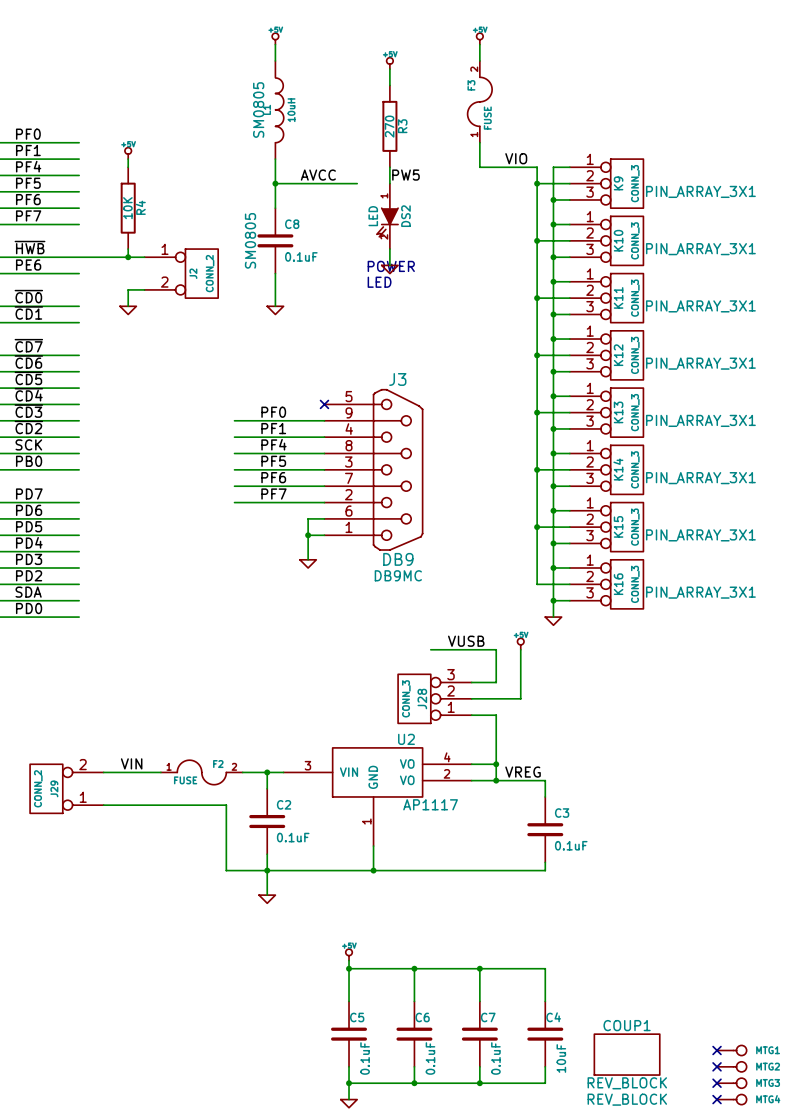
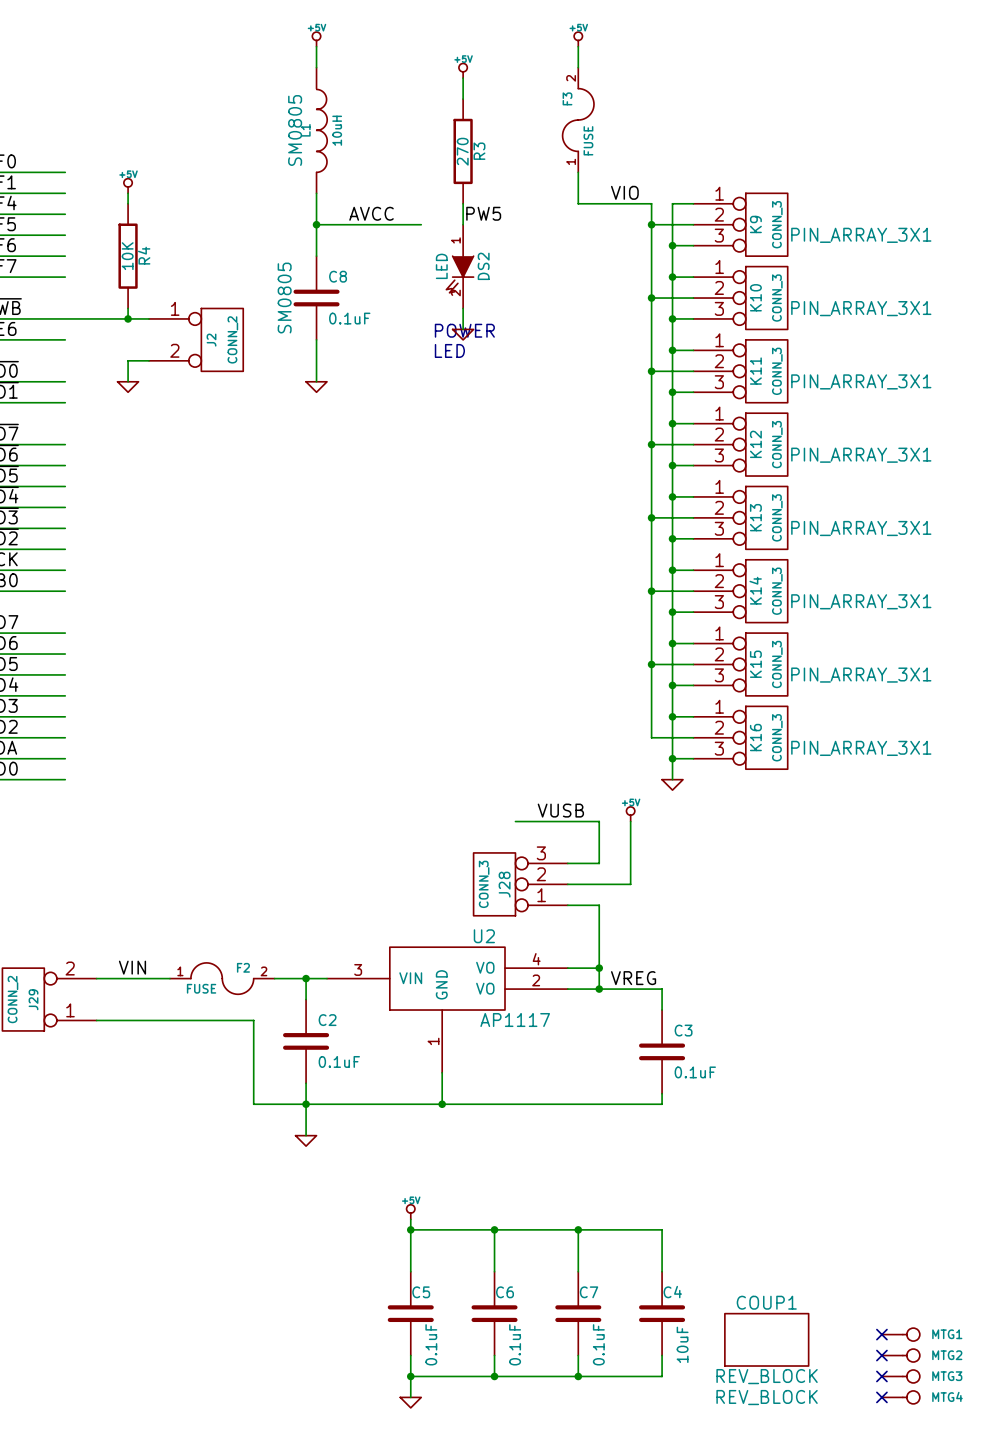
no-connect mark: (324, 404) -> none
label: PF0 (273, 412) -> none
wire: (234, 420) (324, 420) -> none
label: PF1 (273, 428) -> none
wire: (234, 437) (324, 437) -> none
label: PF4 (273, 444) -> none
wire: (234, 453) (324, 453) -> none
label: PF5 (273, 461) -> none
wire: (234, 469) (324, 469) -> none
J3: DB9 (373, 469) -> none
label: PF6 (273, 477) -> none
wire: (234, 486) (324, 486) -> none
label: PF7 (273, 494) -> none
wire: (234, 502) (324, 502) -> none
wire: (324, 518) (308, 518) (308, 559) -> none
wire: (308, 535) (324, 535) -> none
junction: (308, 535) -> none
power symbol: (308, 563) -> none

